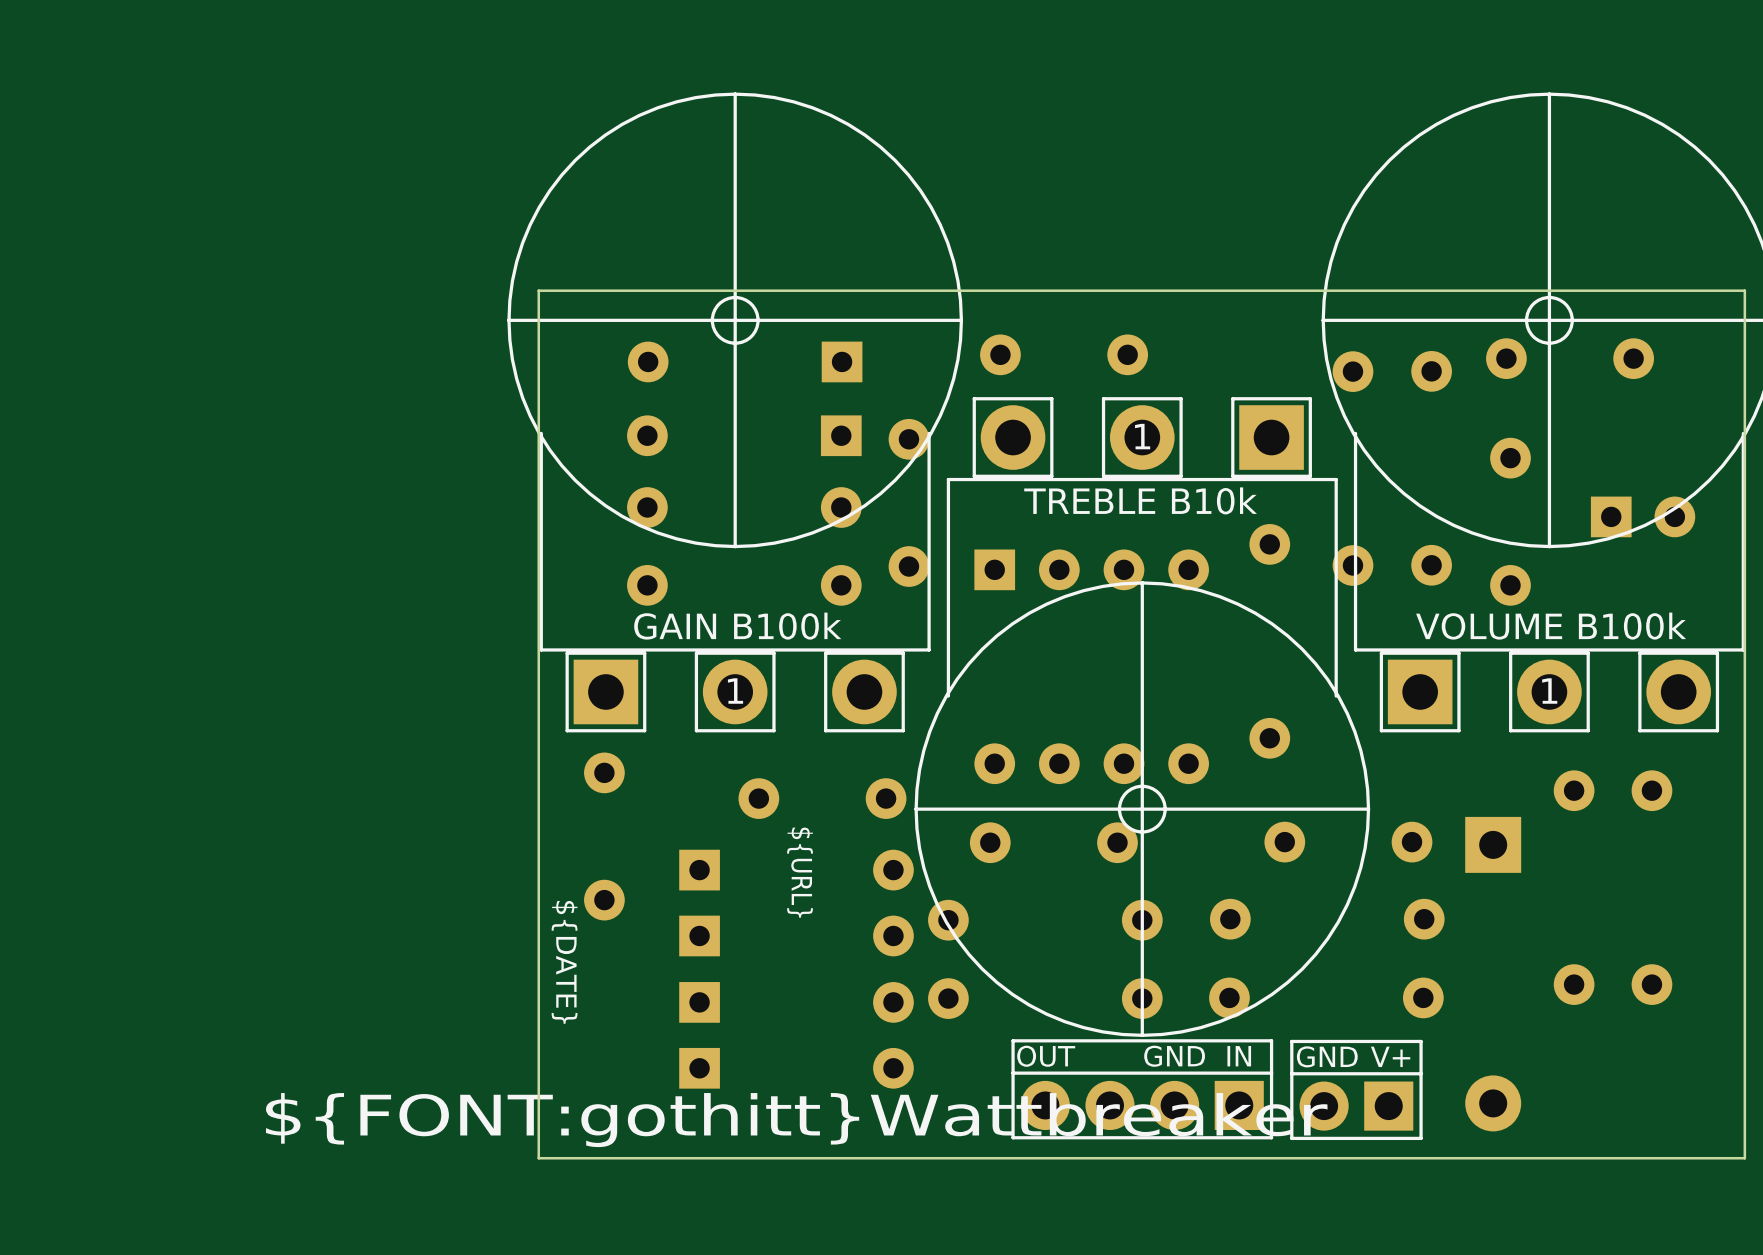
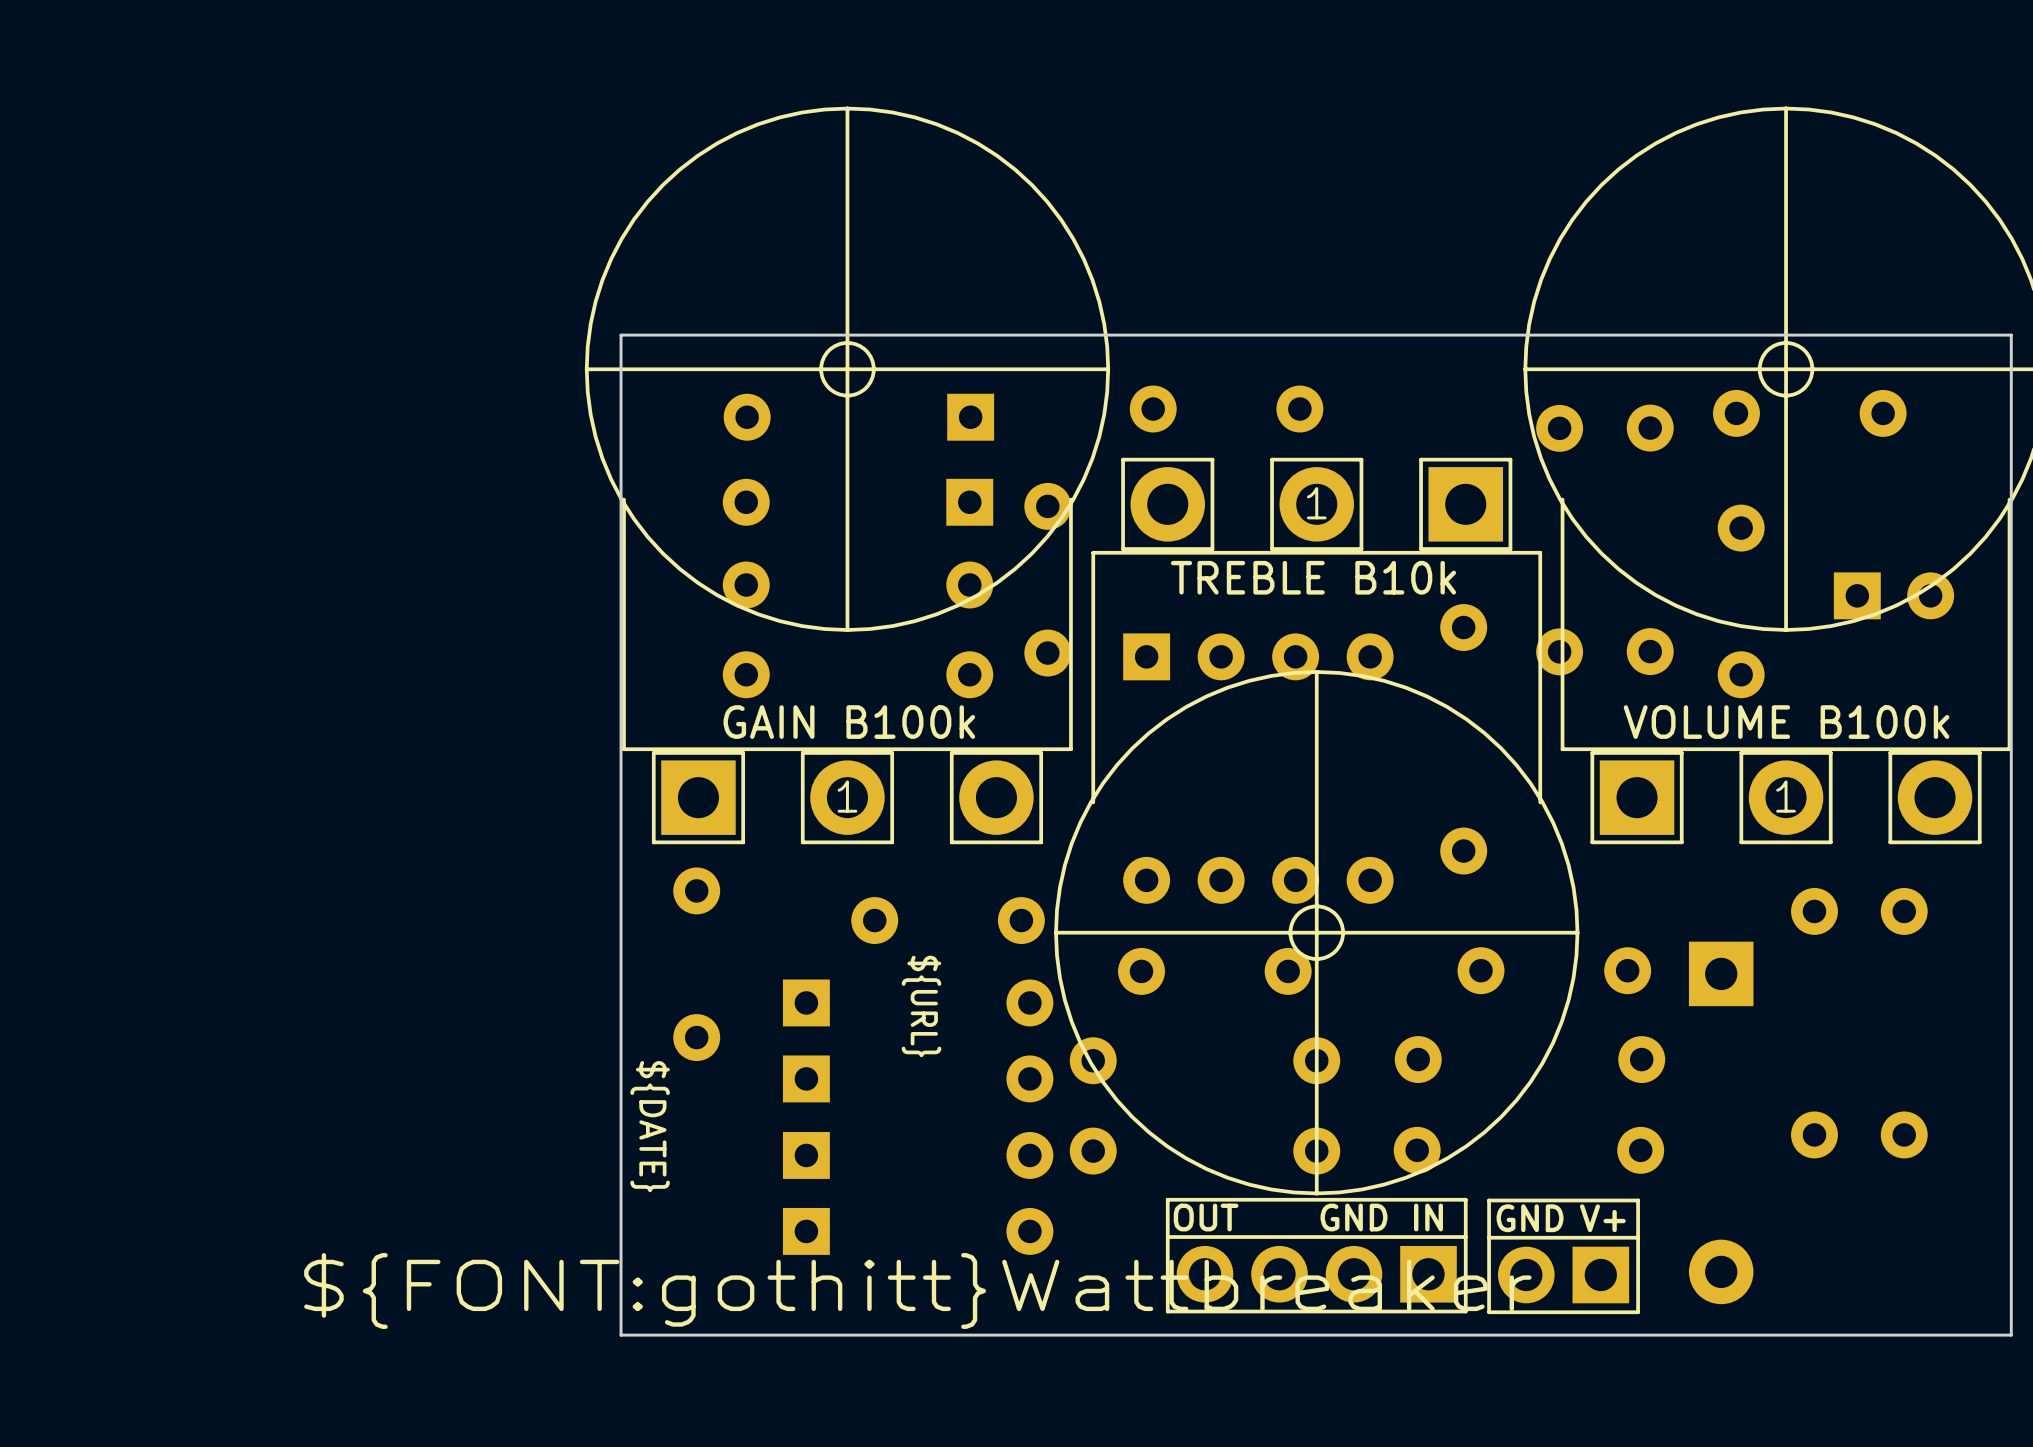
text position: ${DATE} (564, 962) -> ${DATE} (650, 1126)

